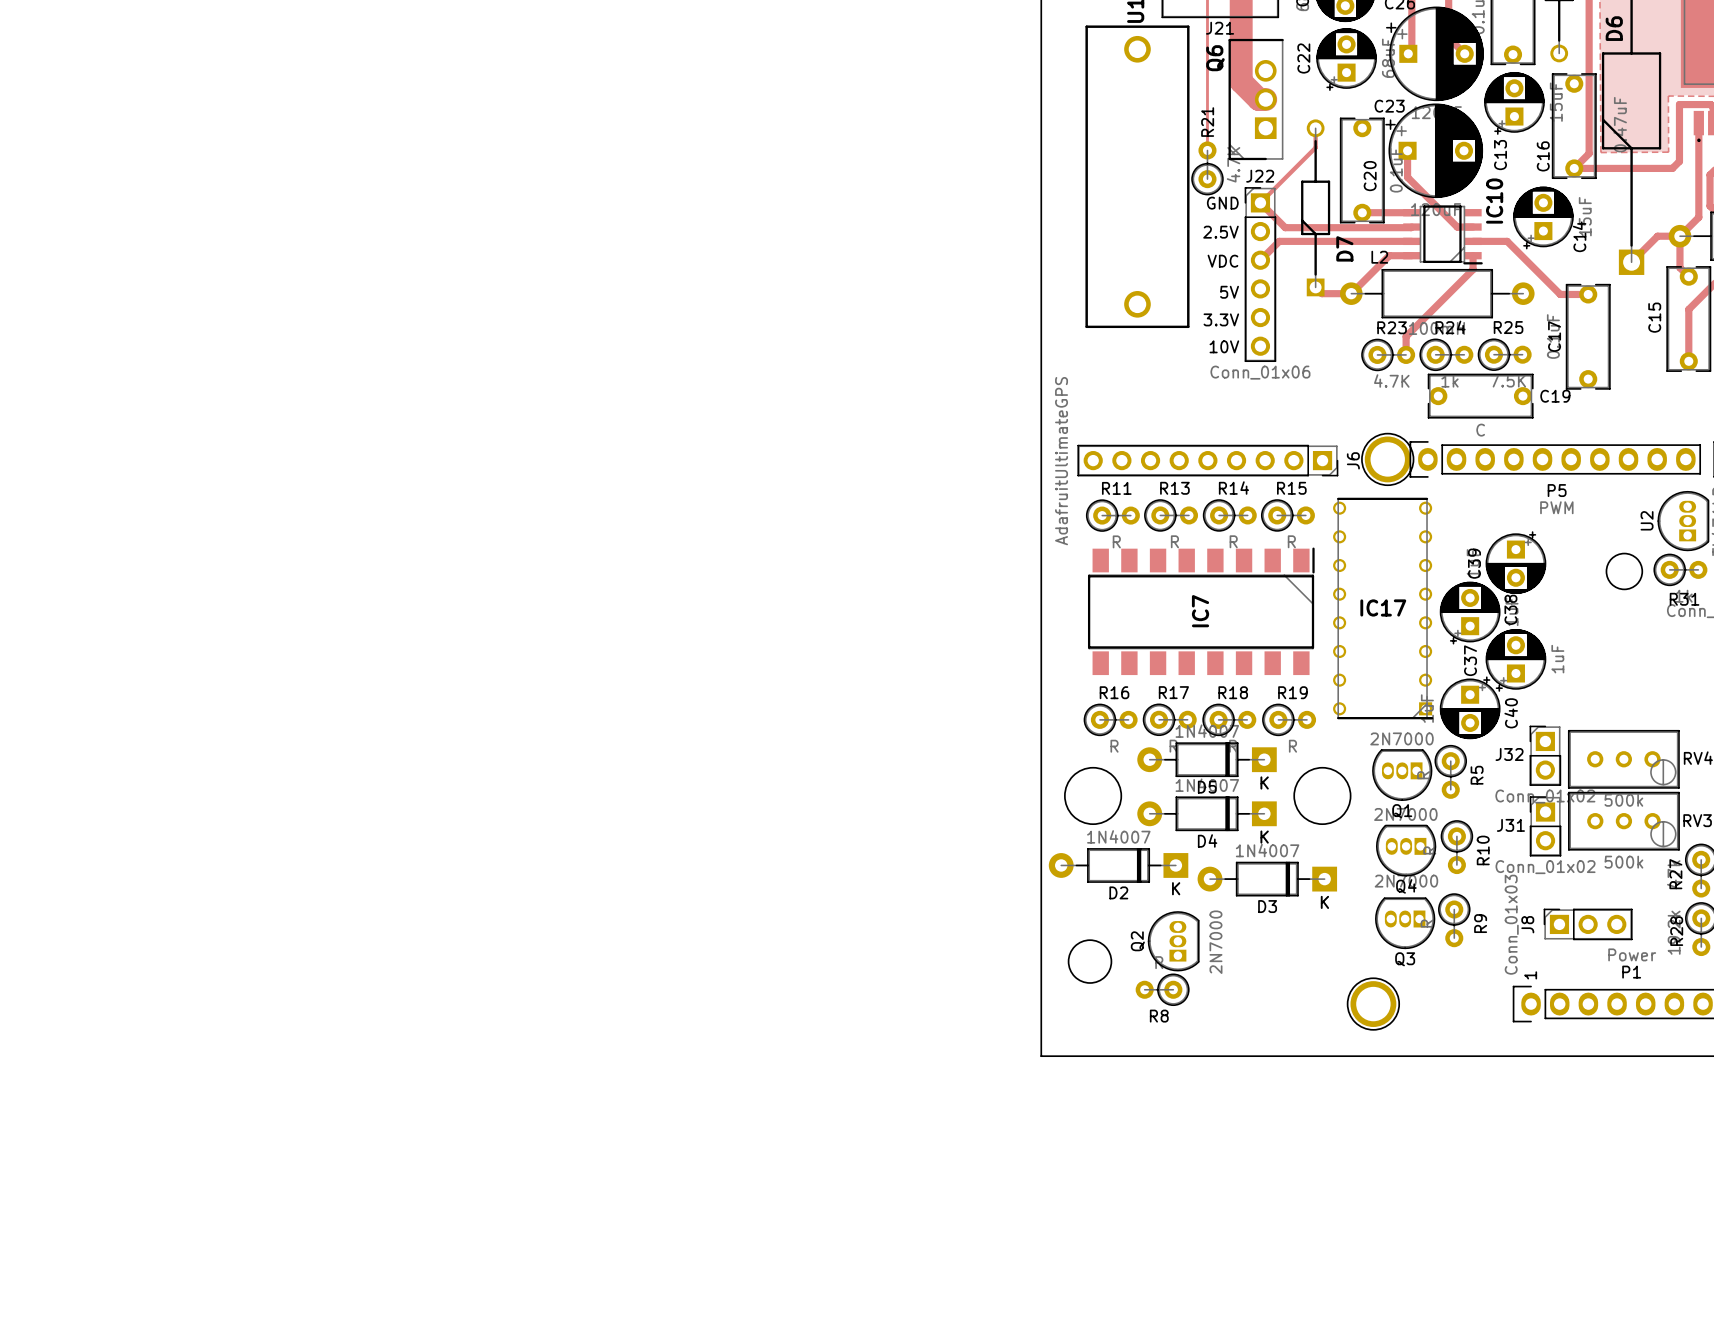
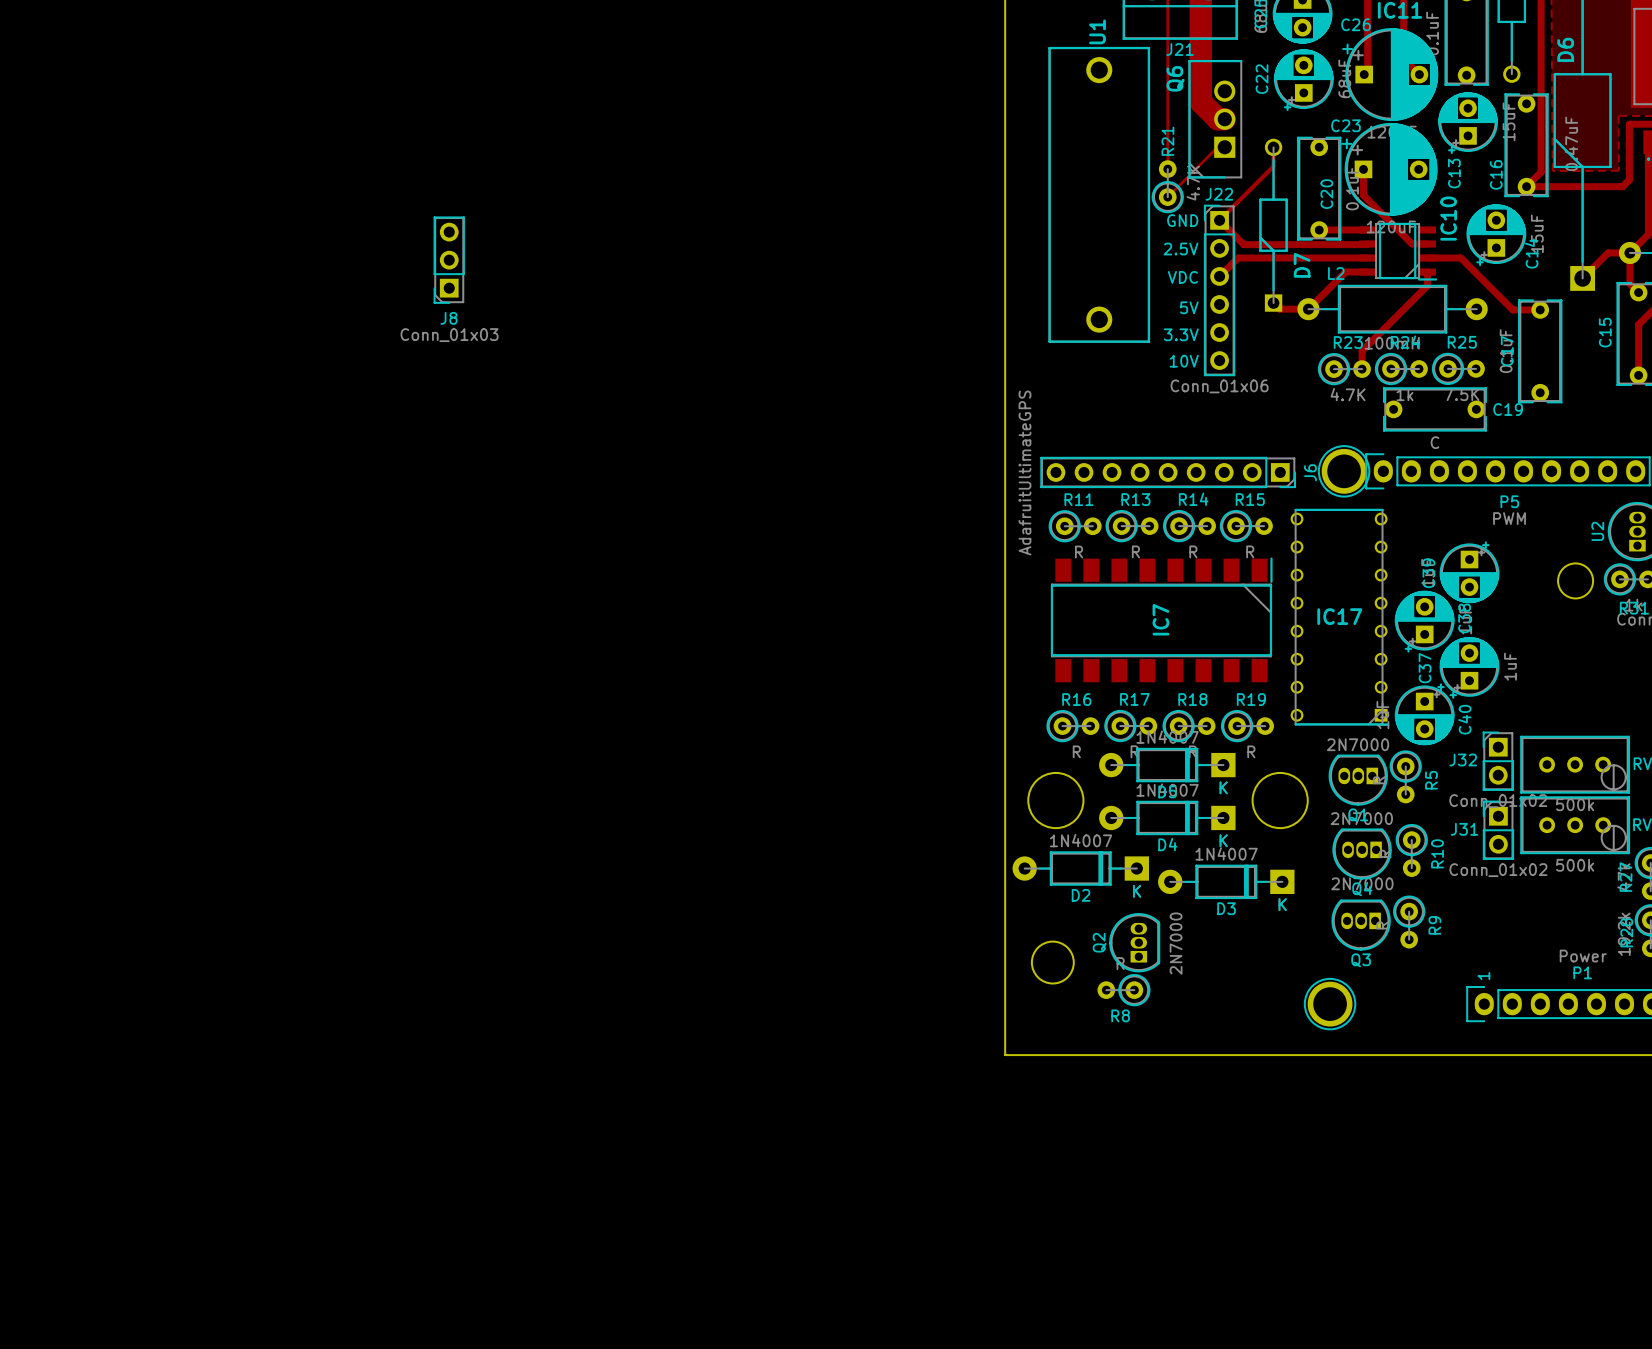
track: none -> (1222, 145) (1224, 147) (1217, 147) (1167, 197)
J8 rotation: 0° (1588, 924) -> 90° counterclockwise (449, 260)
J8 position: (1588, 924) -> (449, 260)

